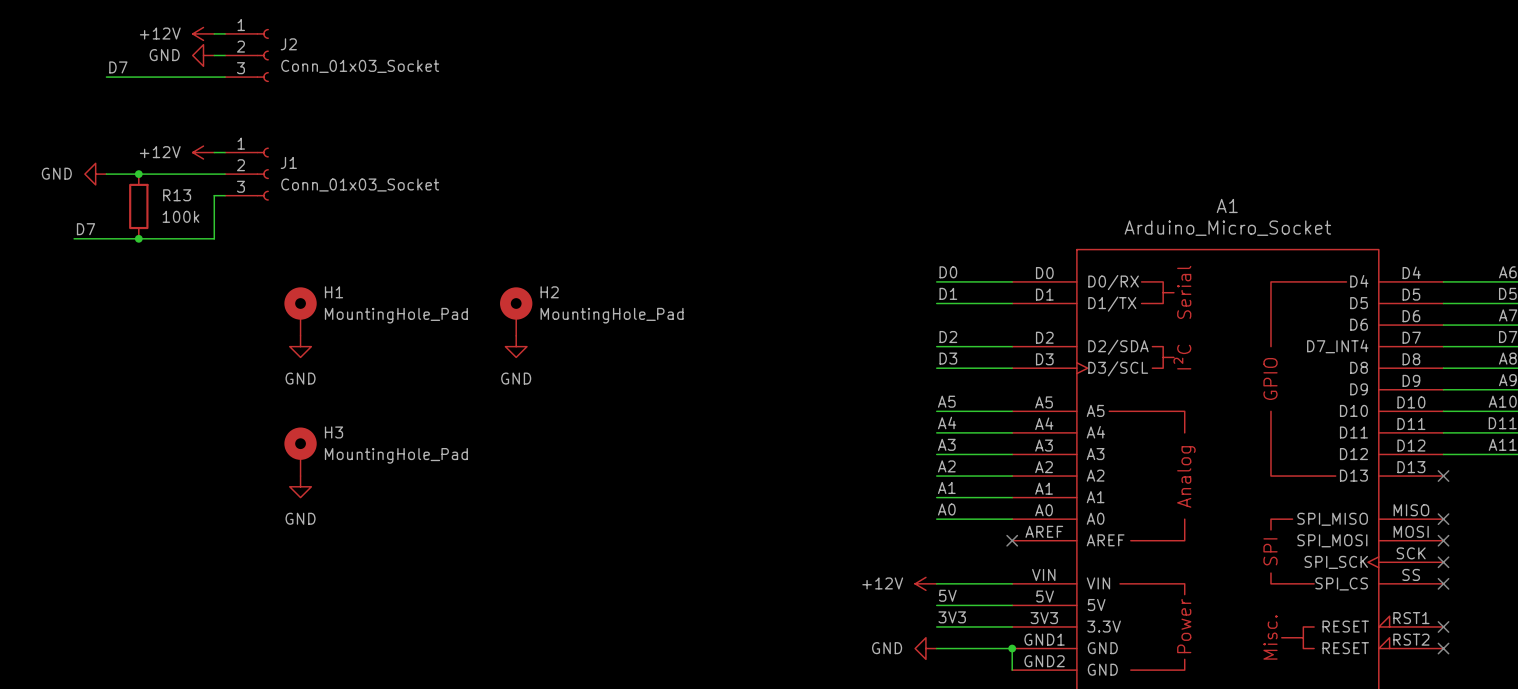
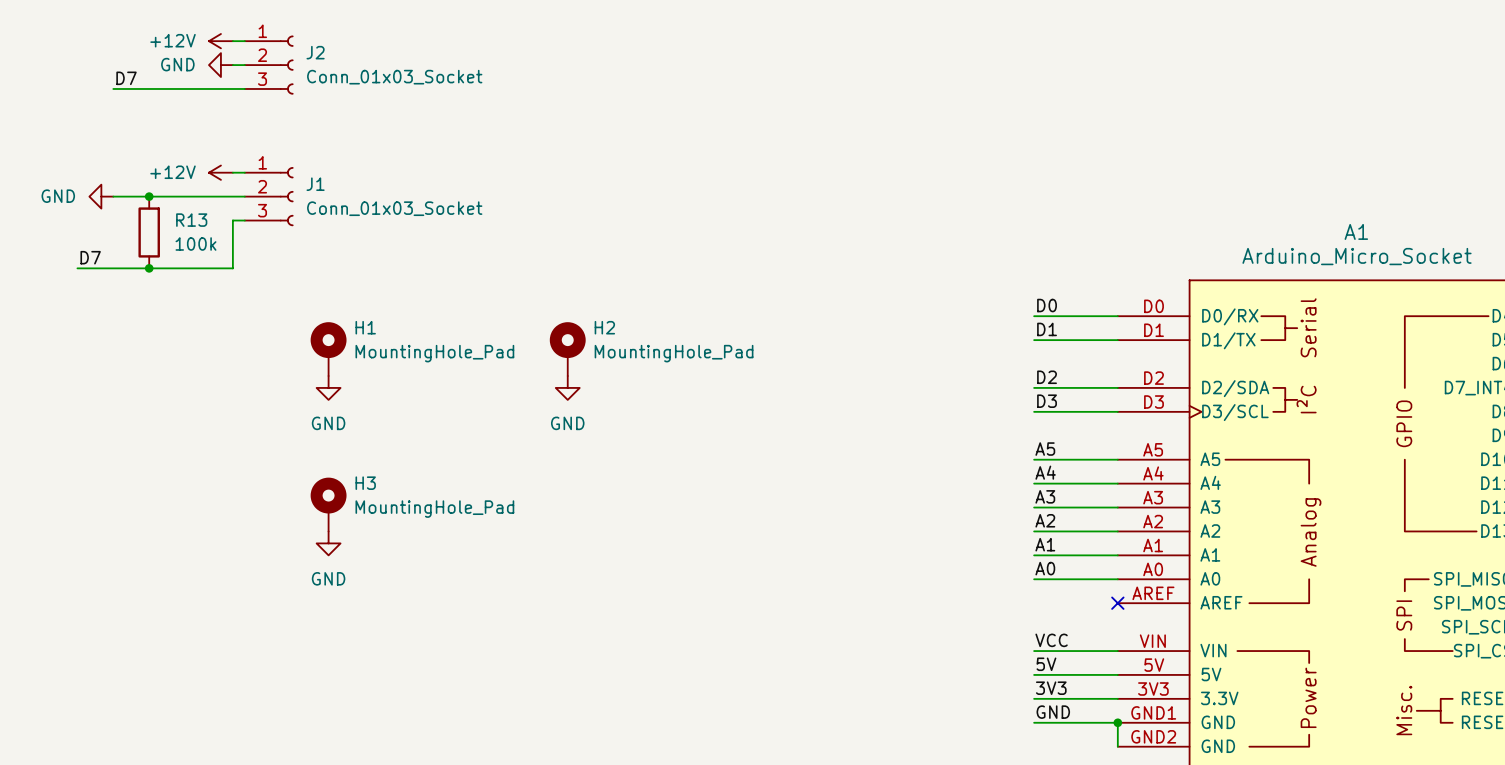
label: none -> VCC (1051, 640)
power symbol: +12V (925, 583) -> none
label: none -> GND (1053, 712)
power symbol: GND (925, 648) -> none

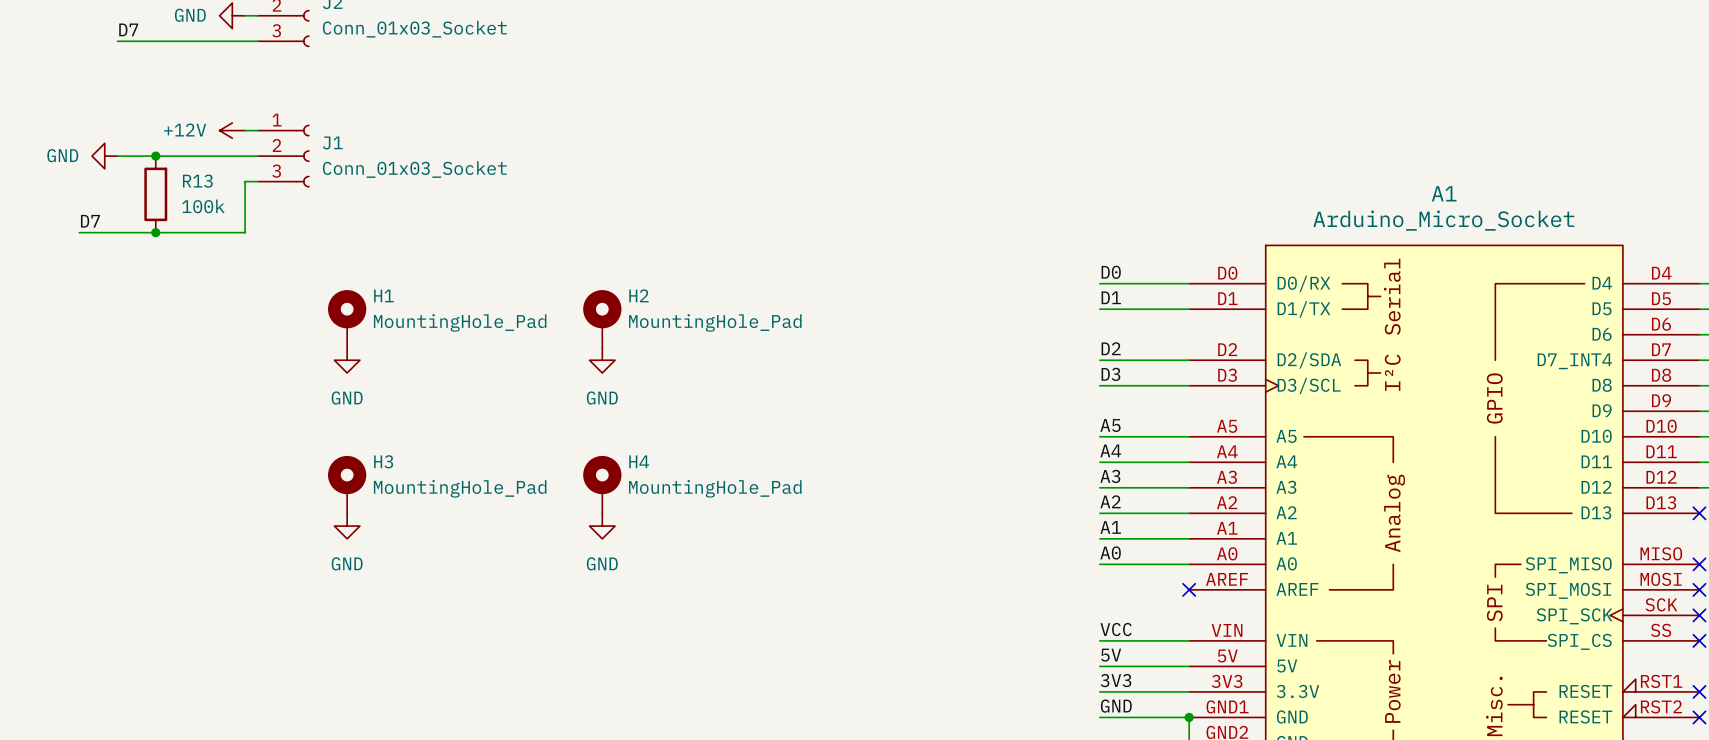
H4: none -> MountingHole_Pad (602, 484)
power symbol: none -> GND (602, 526)

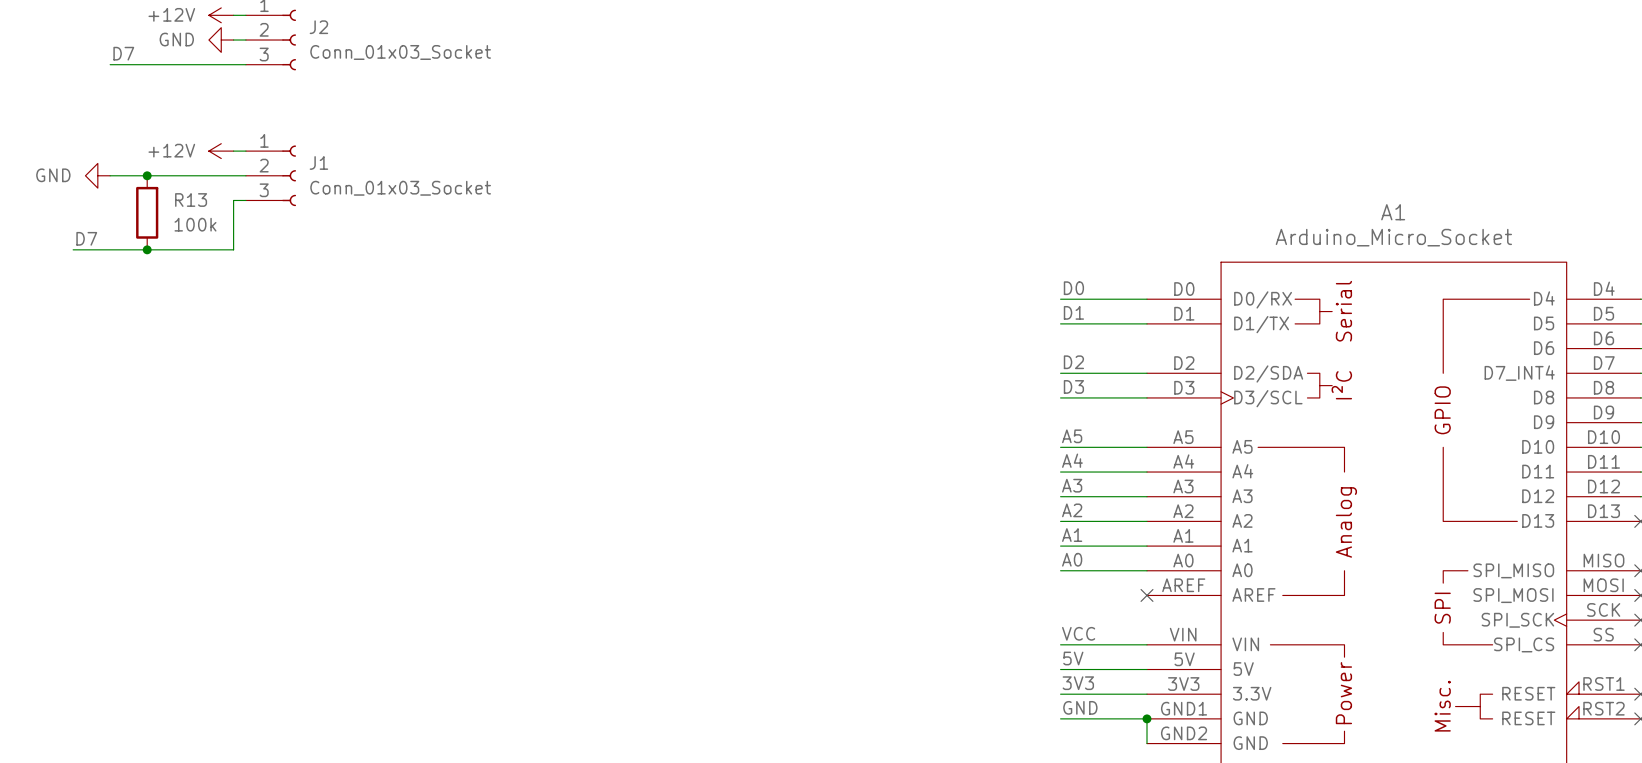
H1: MountingHole_Pad (347, 318) -> none
H2: MountingHole_Pad (602, 318) -> none
power symbol: GND (347, 360) -> none
power symbol: GND (602, 360) -> none
H3: MountingHole_Pad (347, 484) -> none
H4: MountingHole_Pad (602, 484) -> none
power symbol: GND (347, 526) -> none
power symbol: GND (602, 526) -> none

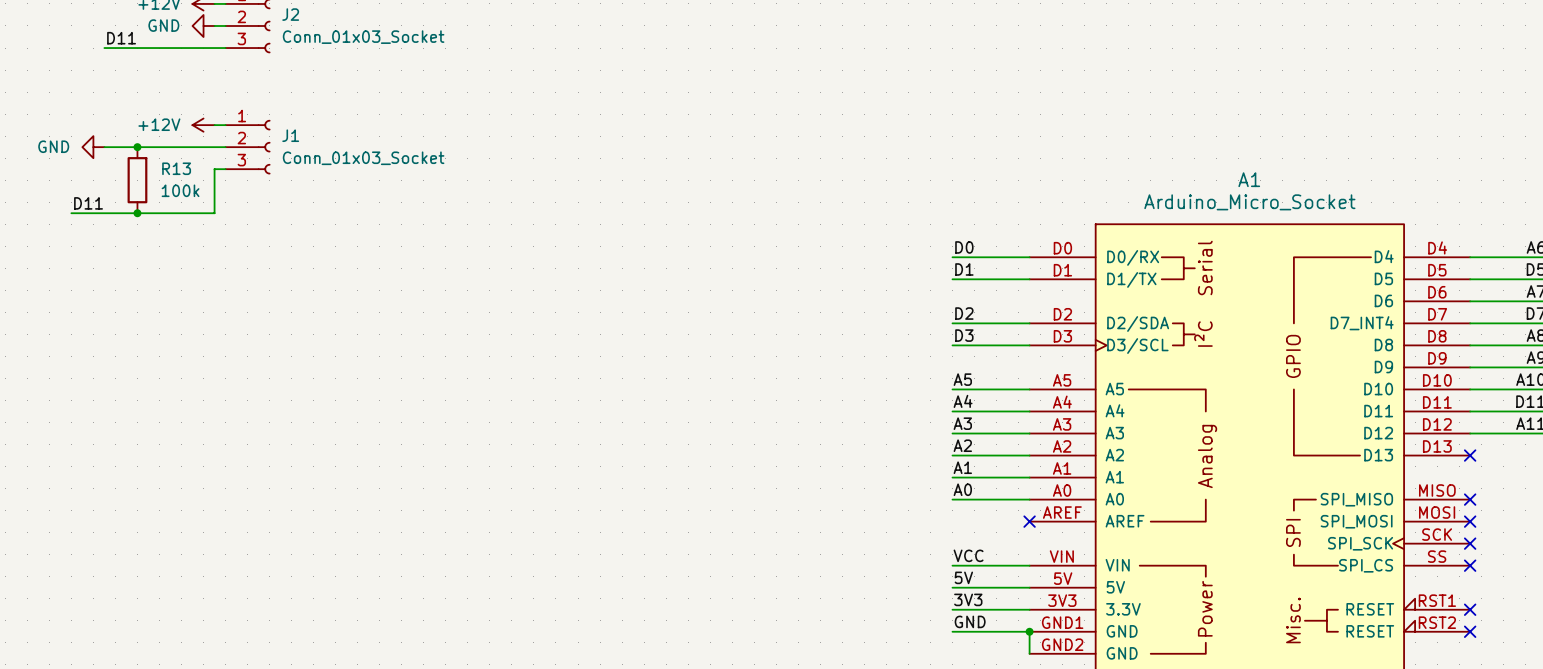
label: D7 (123, 53) -> D11 (121, 38)
label: D7 (86, 238) -> D11 (88, 203)

